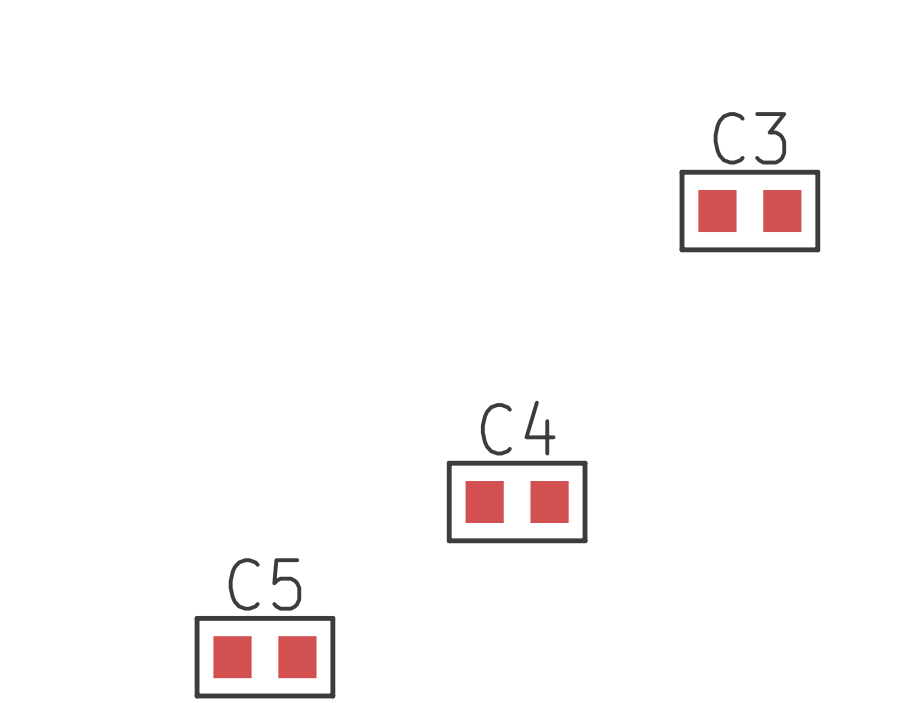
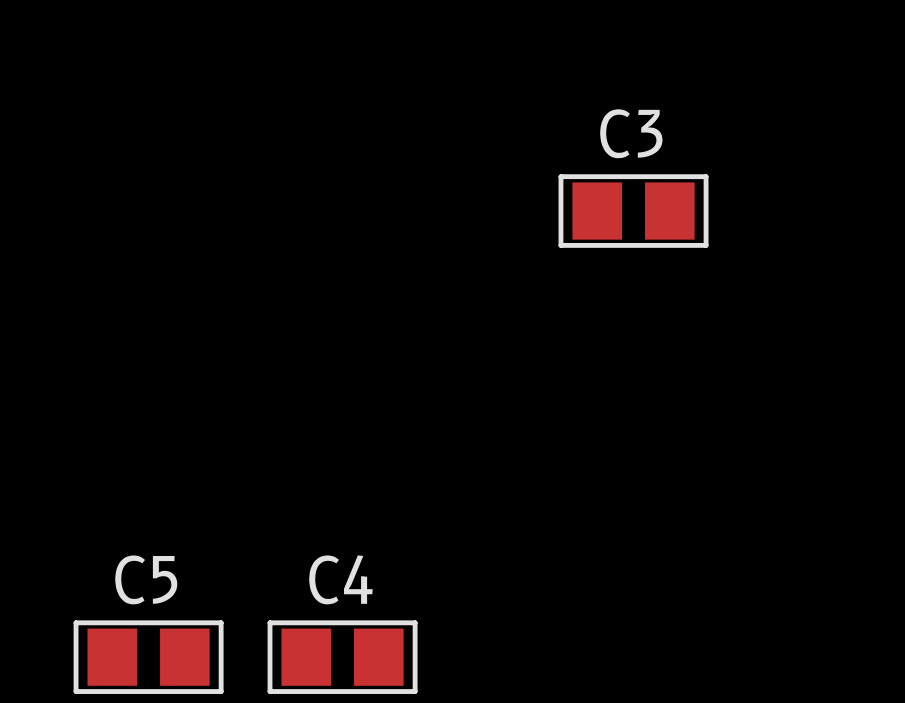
C3 footprint: [679, 169, 821, 253] -> [558, 174, 709, 248]
C4 footprint: [446, 460, 588, 544] -> [267, 620, 418, 694]
C5 footprint: [194, 615, 336, 699] -> [73, 620, 224, 694]

